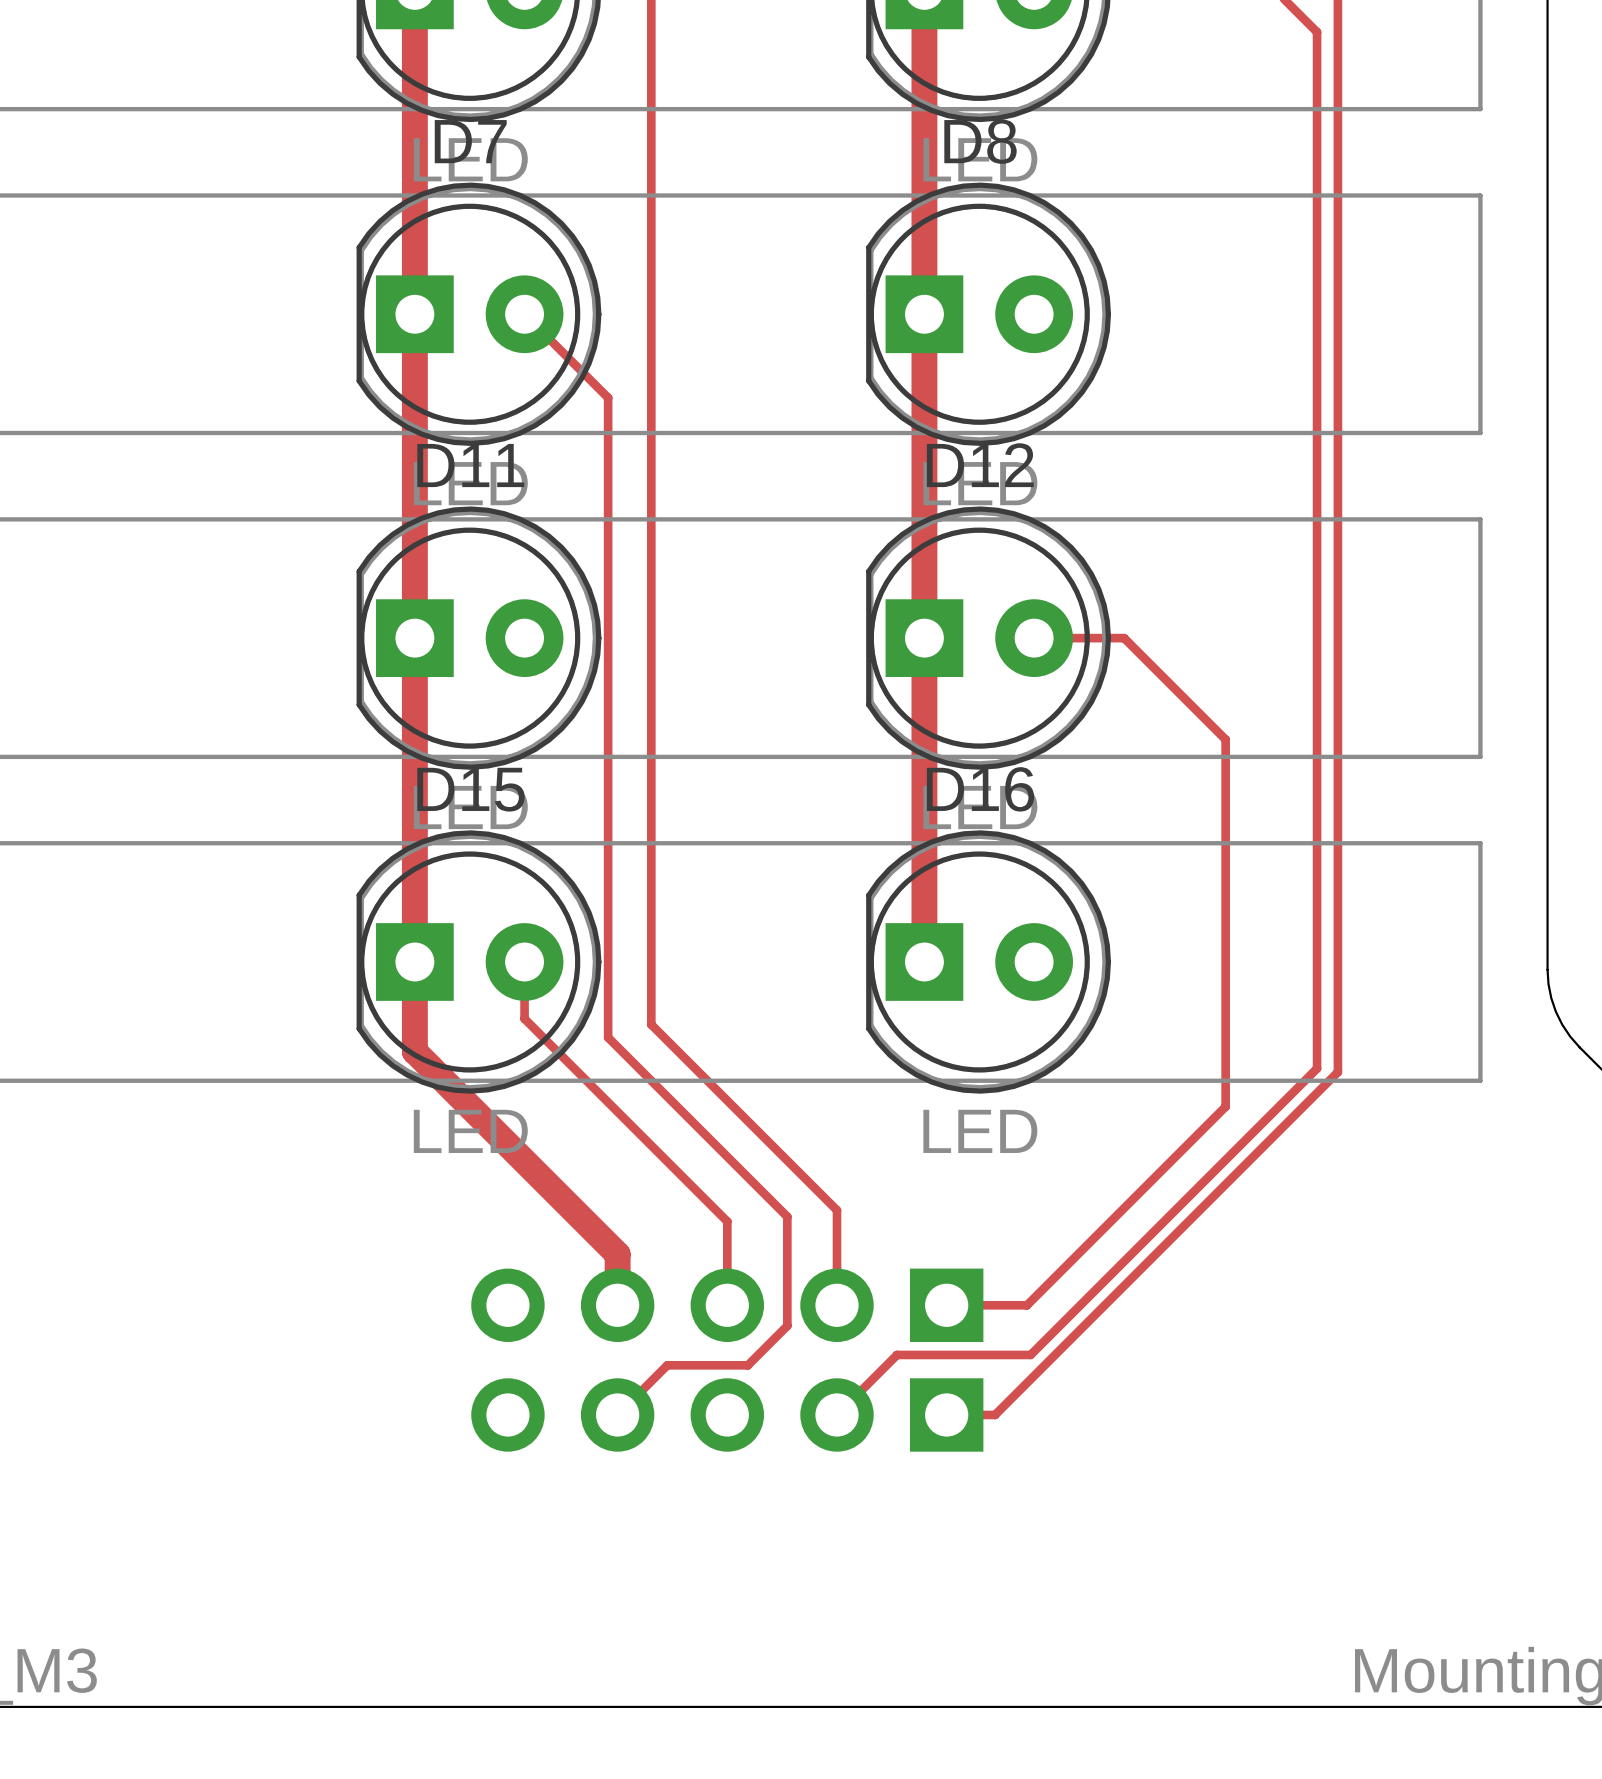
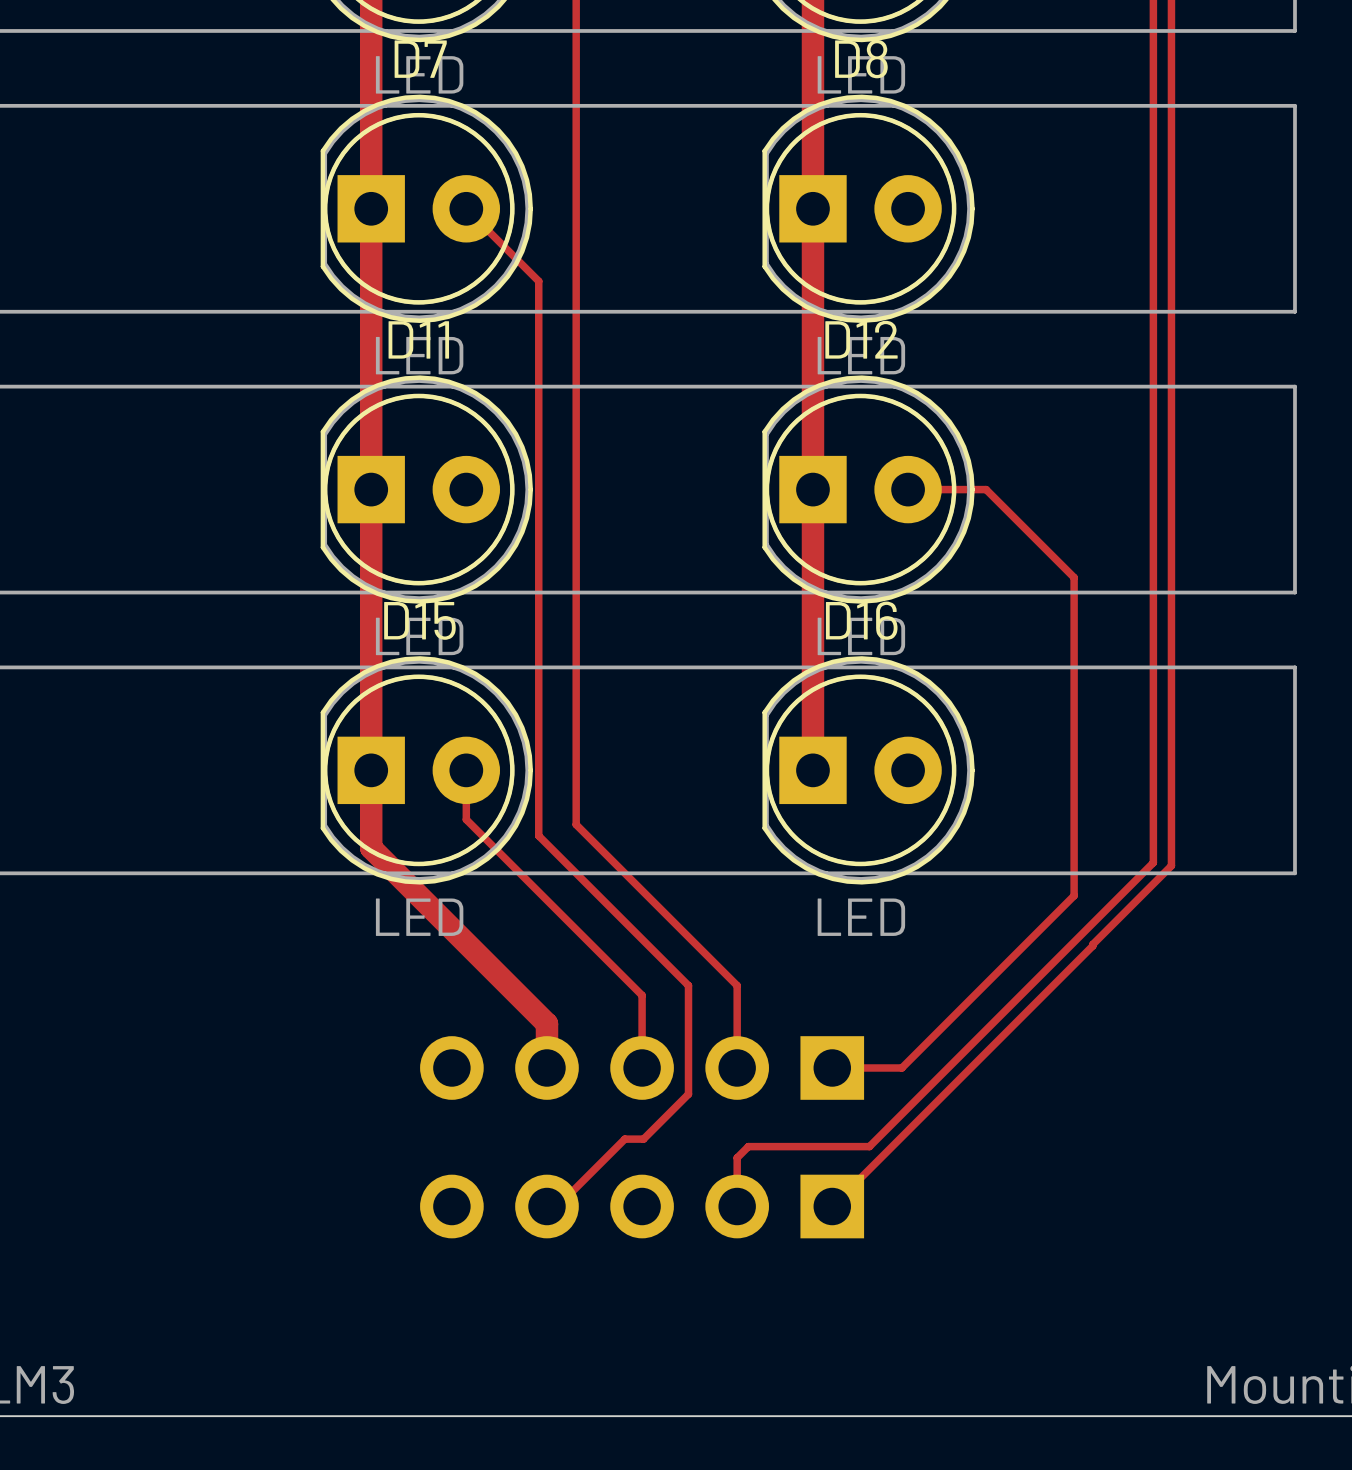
track: (1247, 1162) (995, 1414) (946, 1414) -> (1092, 944) (832, 1206)
track: (780, 1210) (787, 1216) (787, 1325) (747, 1365) (667, 1365) (617, 1414) -> (688, 985) (688, 1094) (643, 1139) (624, 1139) (557, 1206) (546, 1206)
track: (1030, 1354) (897, 1354) (837, 1414) -> (905, 1111) (869, 1146) (748, 1146) (737, 1157) (737, 1206)
part position: (727, 1414) -> (642, 1206)

